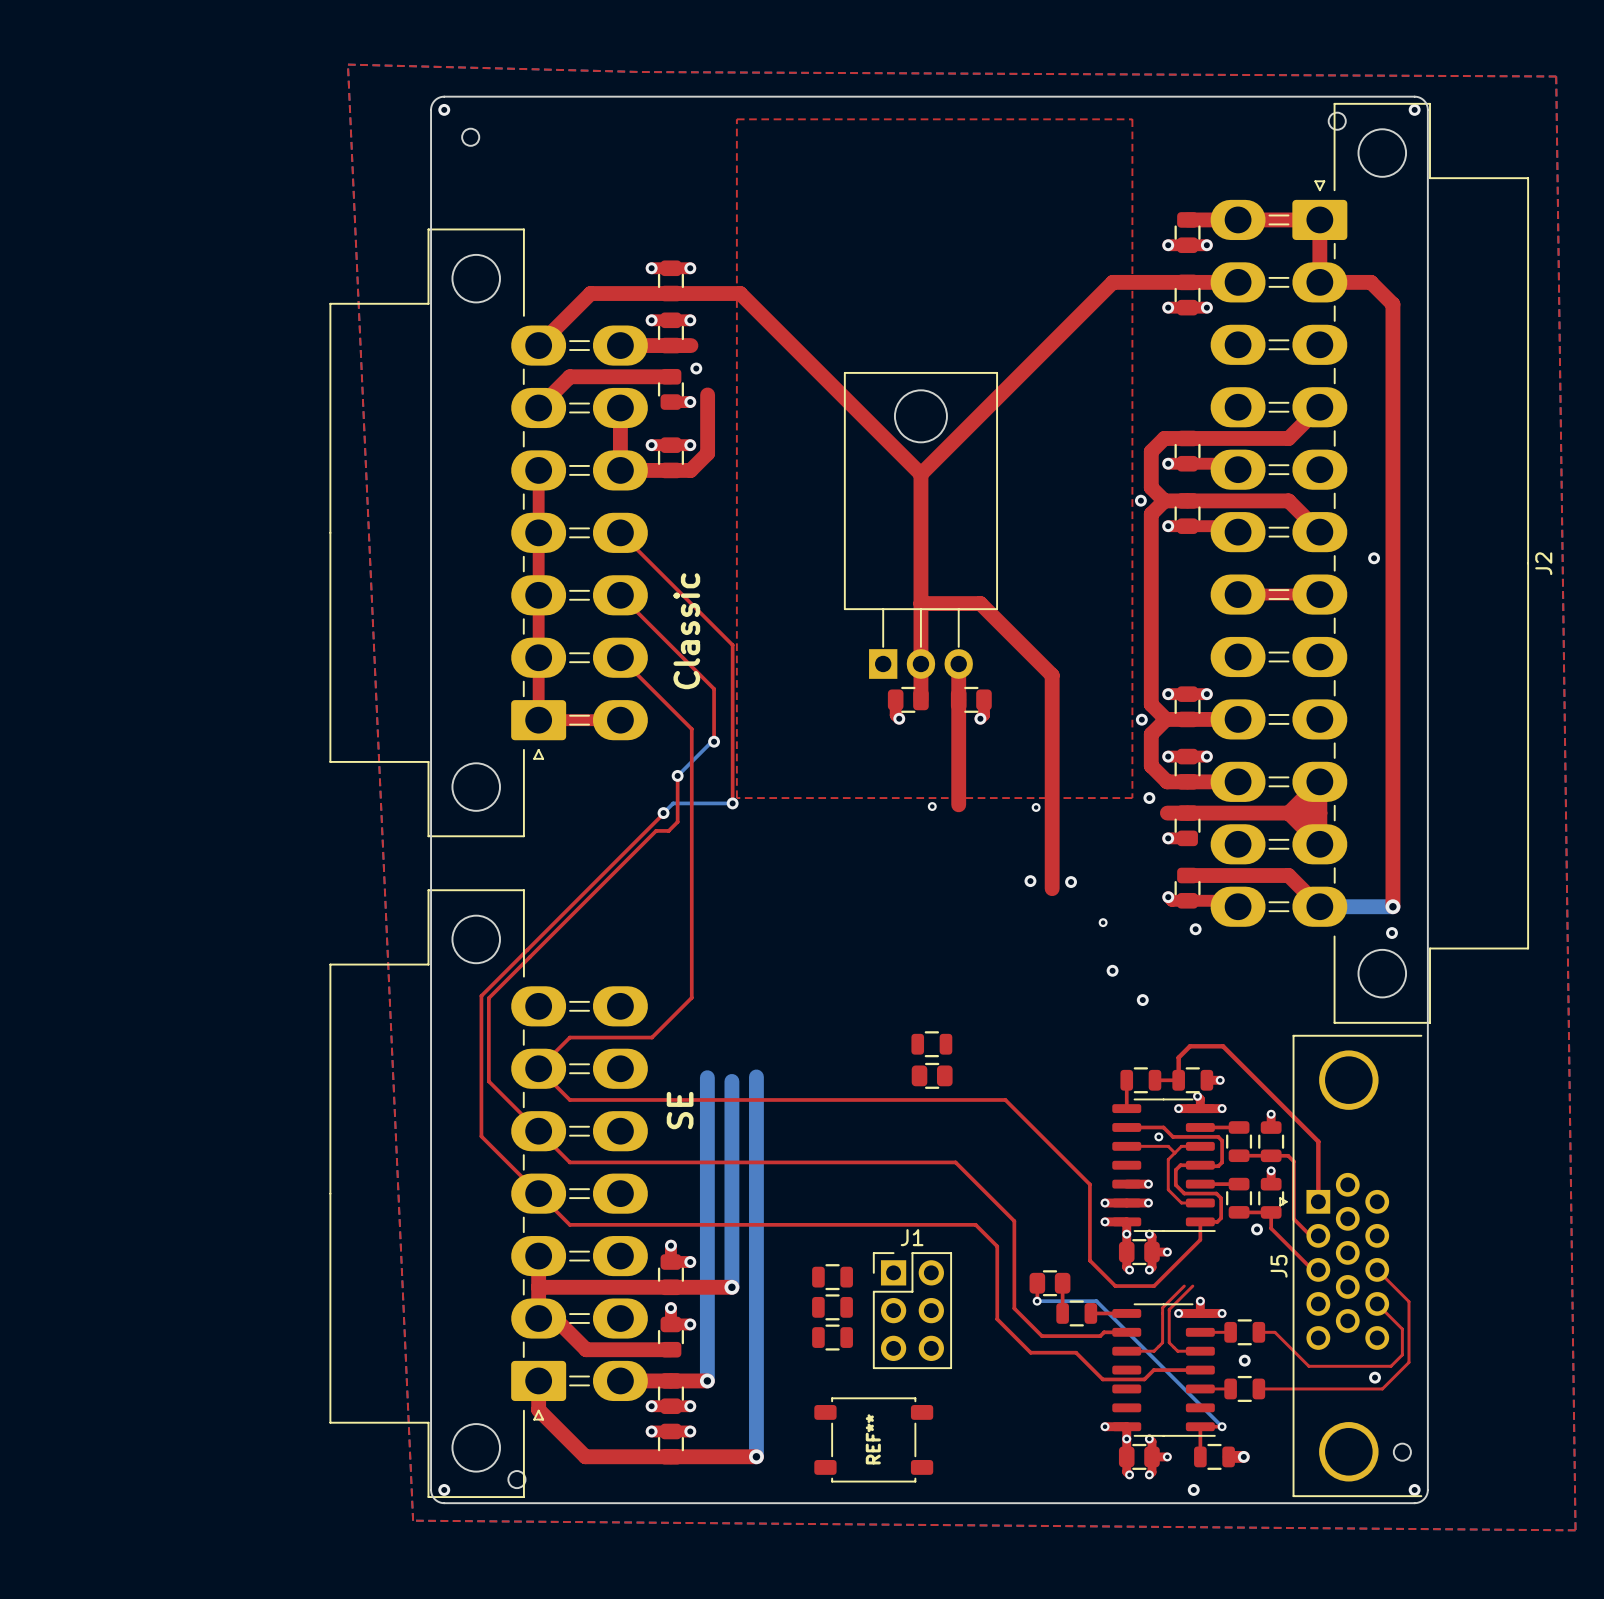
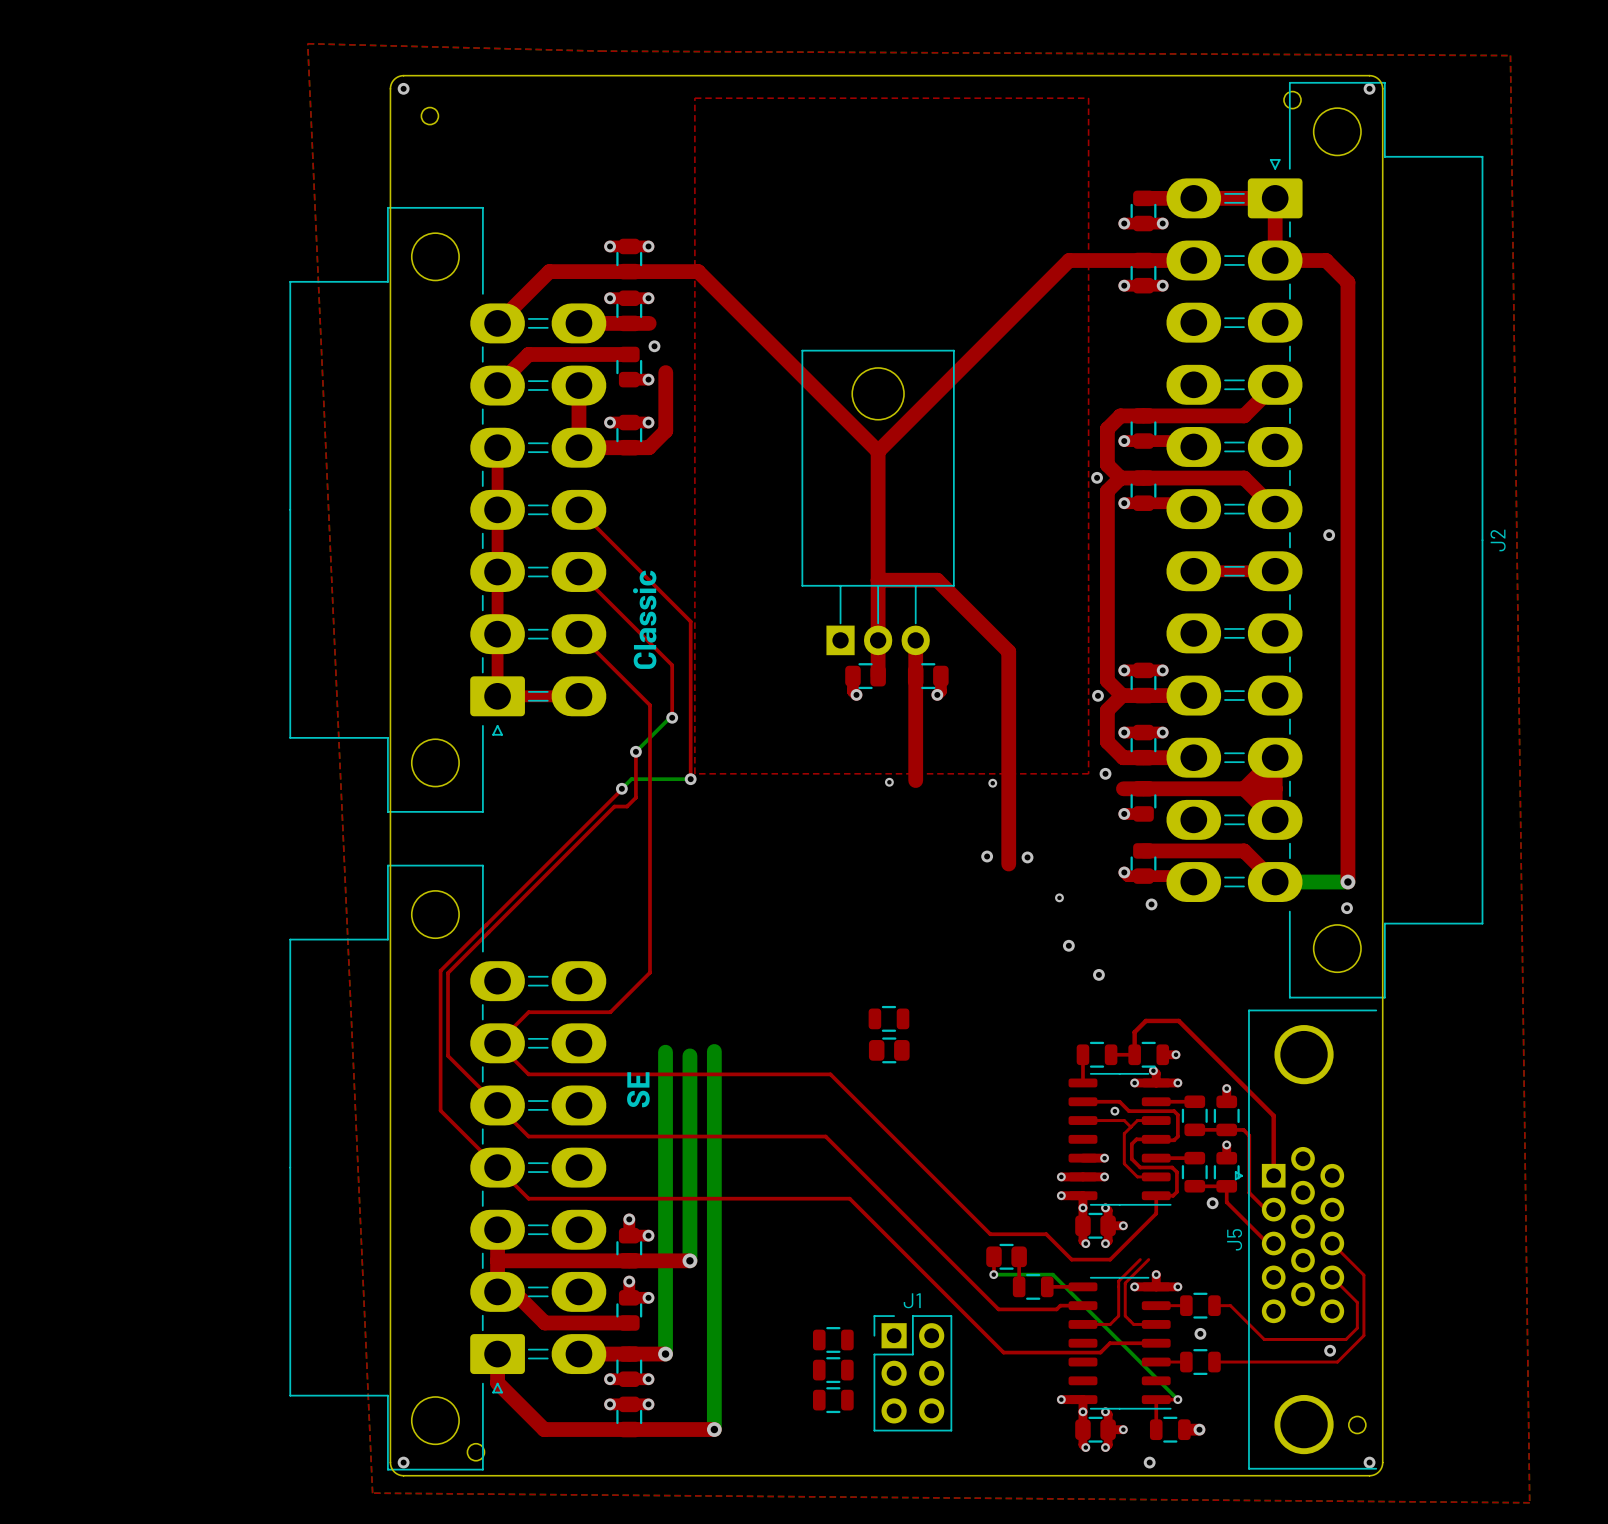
top track: (873, 1099) (1005, 1099) (1089, 1184) (1089, 1260) -> (830, 1074) (990, 1234) (1046, 1234)
top track: (868, 1162) (955, 1162) (1014, 1221) (1014, 1308) -> (825, 1136) (971, 1281)
top track: (892, 1224) (975, 1224) (997, 1246) (997, 1319) (1030, 1352) (1076, 1352) (1102, 1379) -> (849, 1198) (1003, 1352) (1059, 1352)
part: (832, 1277) -> none
part: (832, 1307) -> none
J1 position: (912, 1310) -> (912, 1373)
part: (832, 1337) -> none
part: none -> (833, 1339)
part: none -> (833, 1370)
part: none -> (833, 1400)
REF**: (873, 1439) -> none

